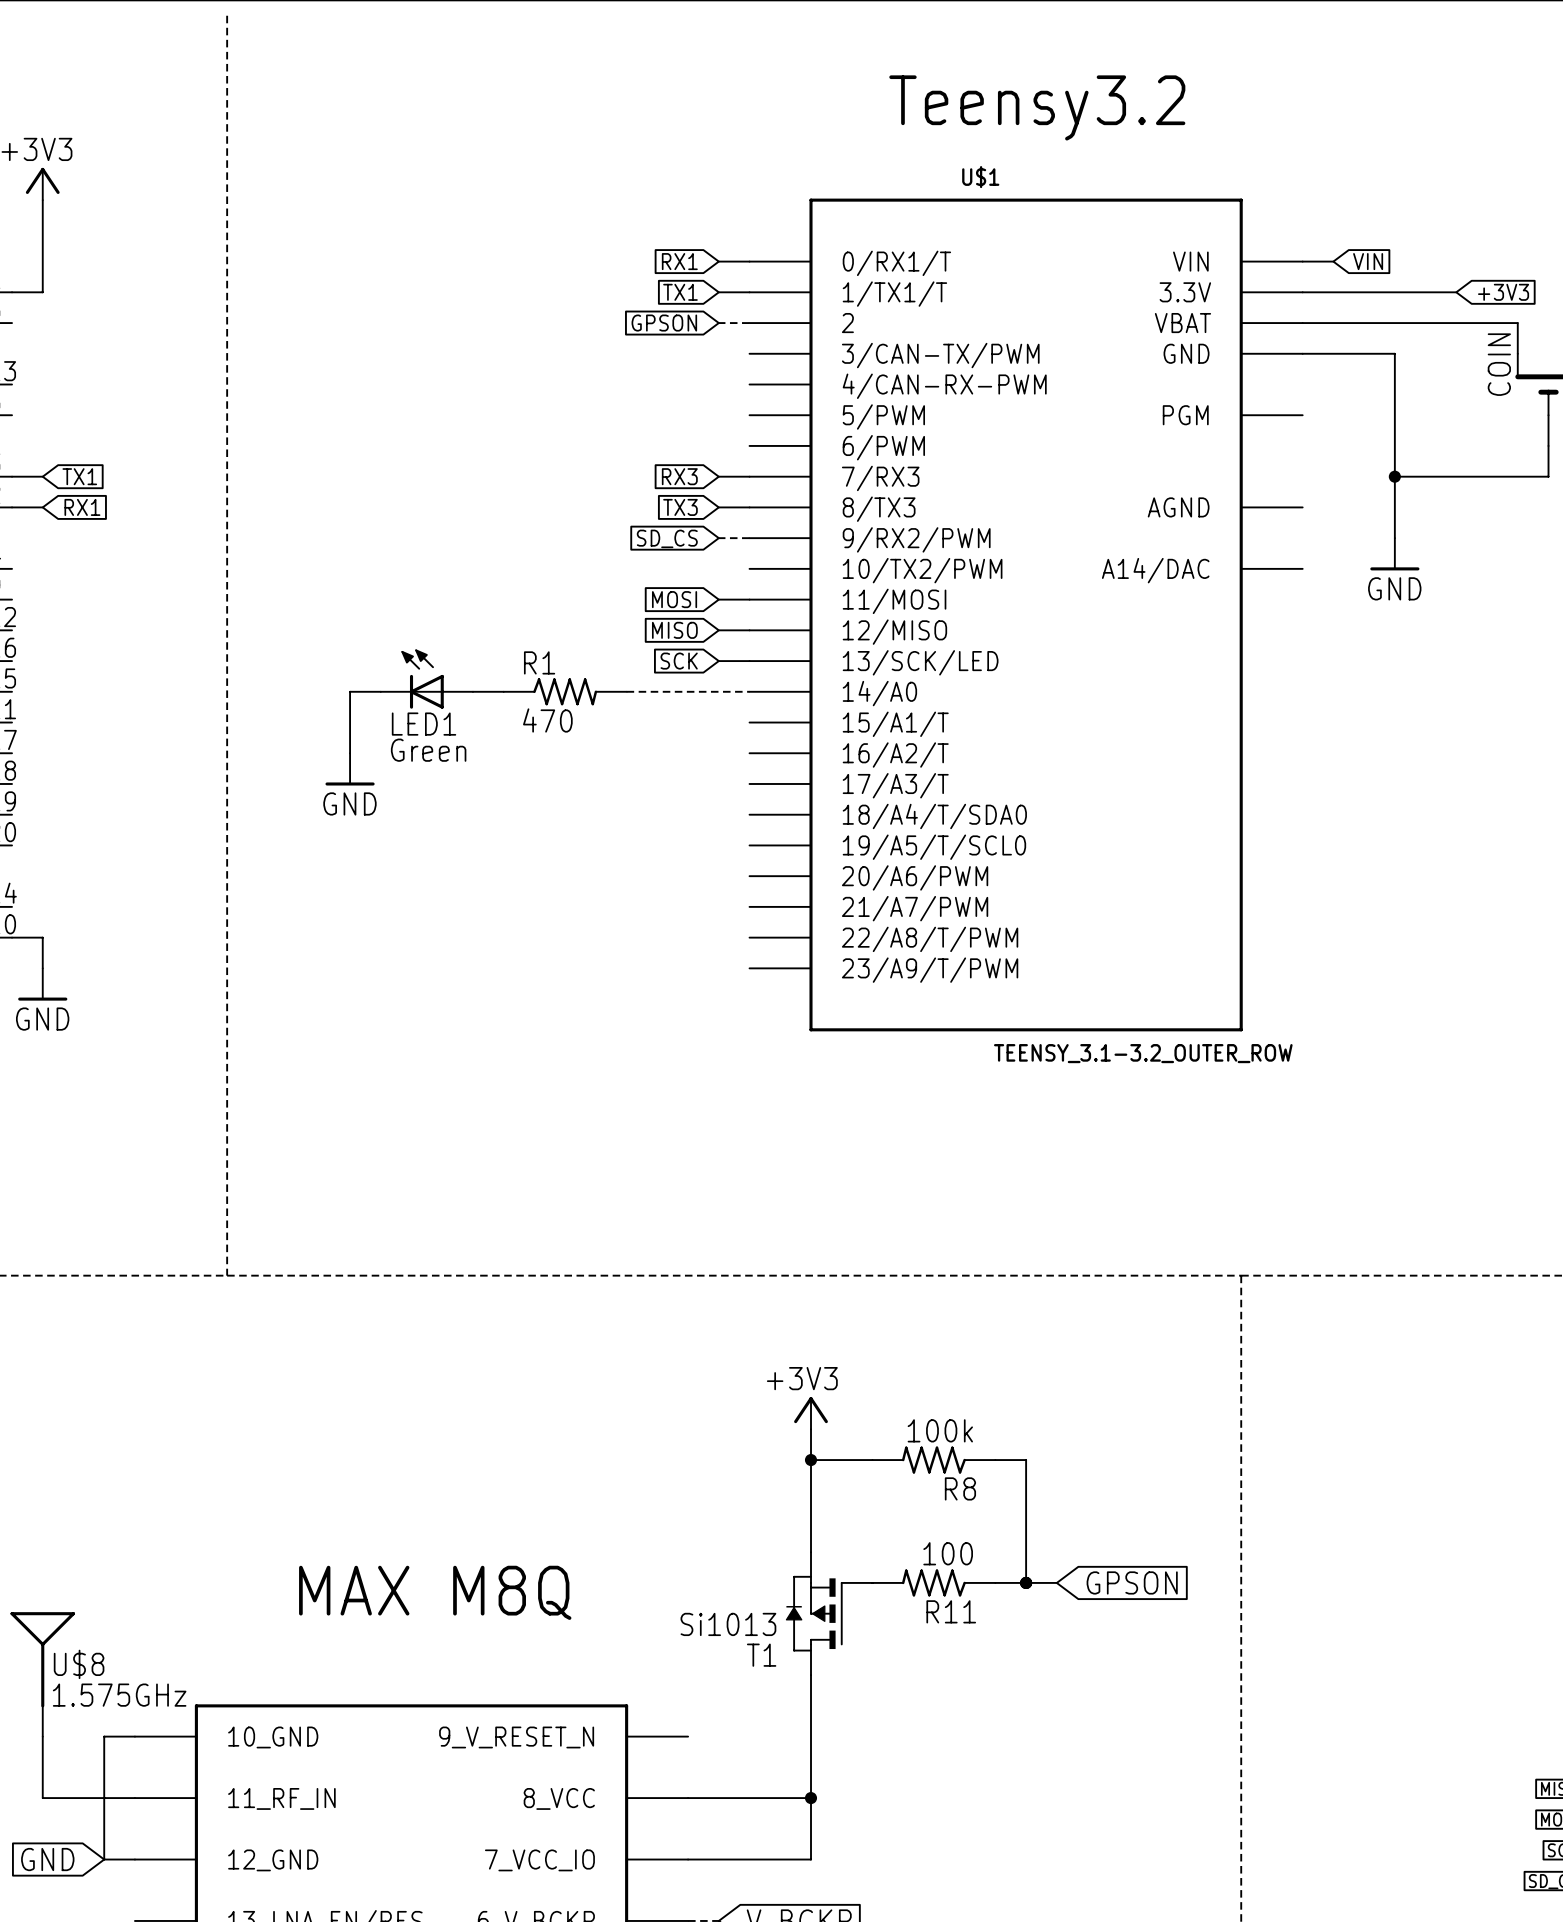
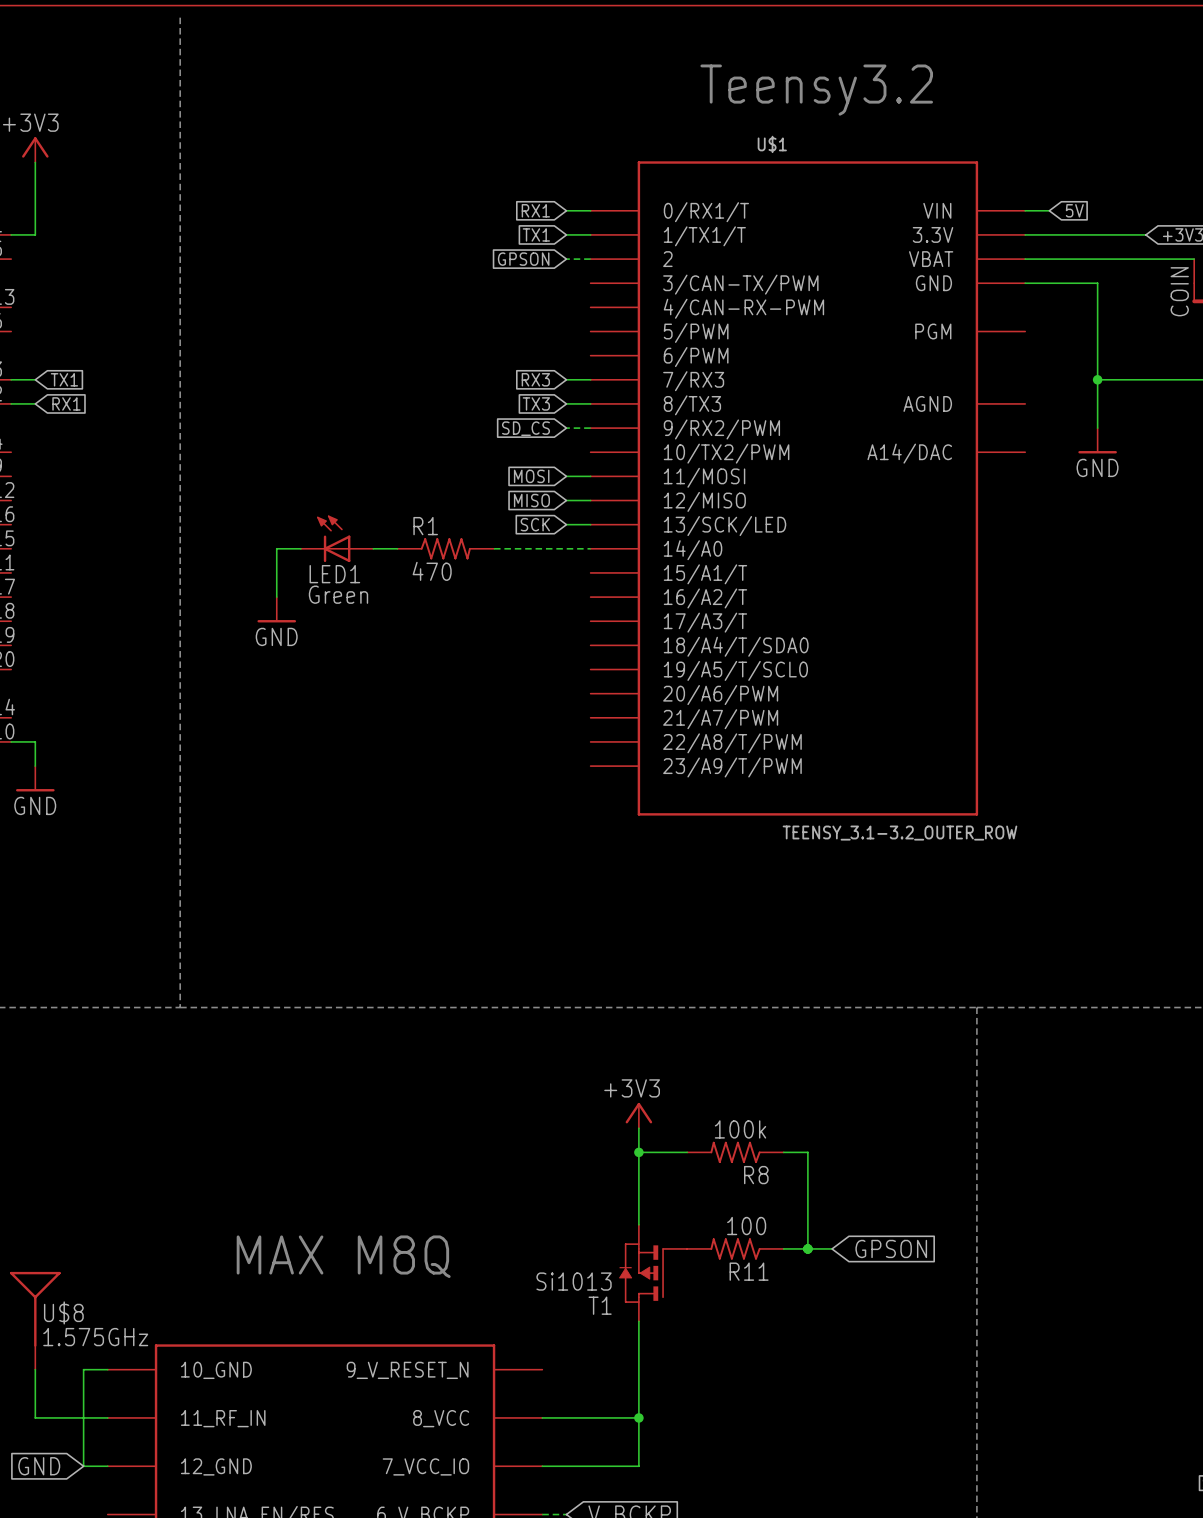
global label: VIN (1368, 261) -> 5V (1074, 210)

